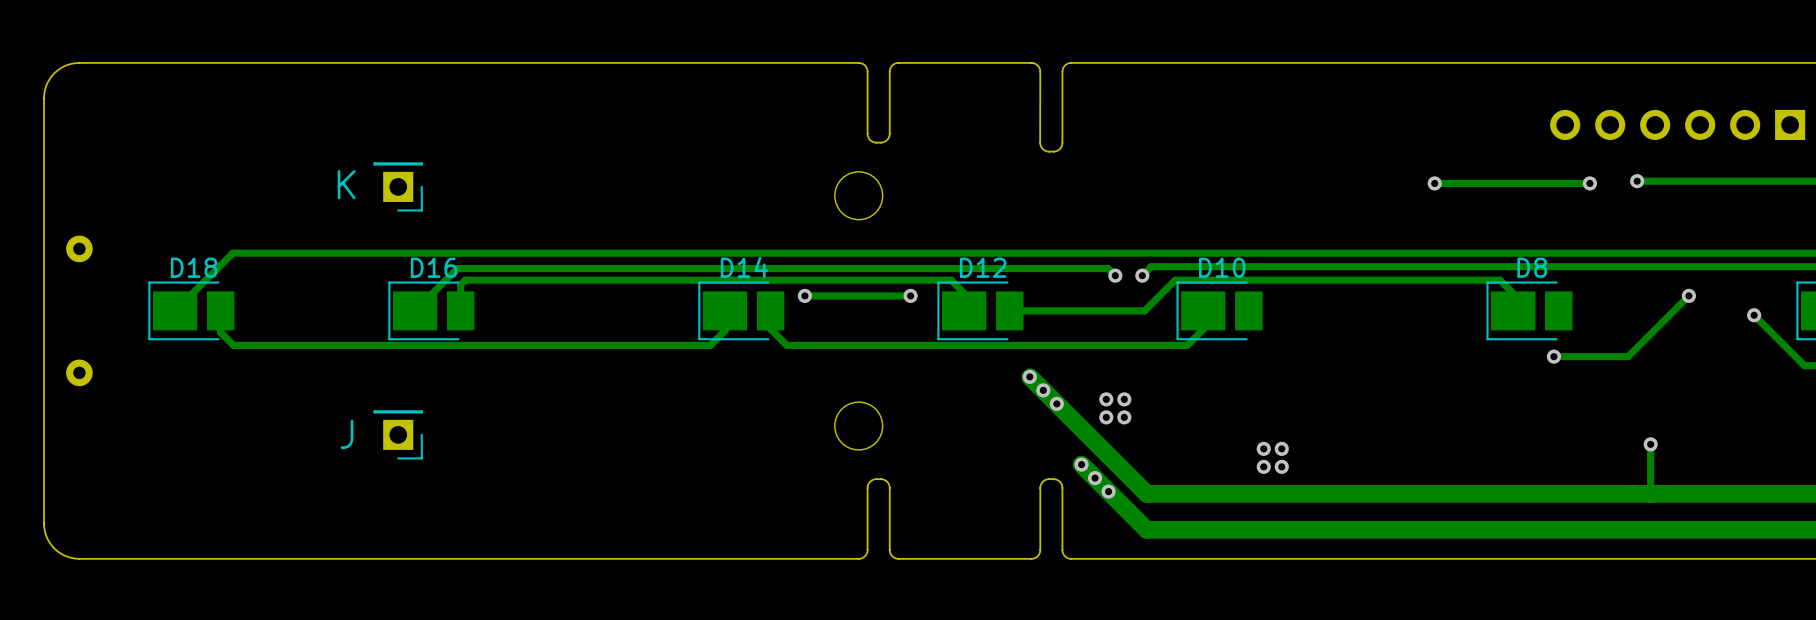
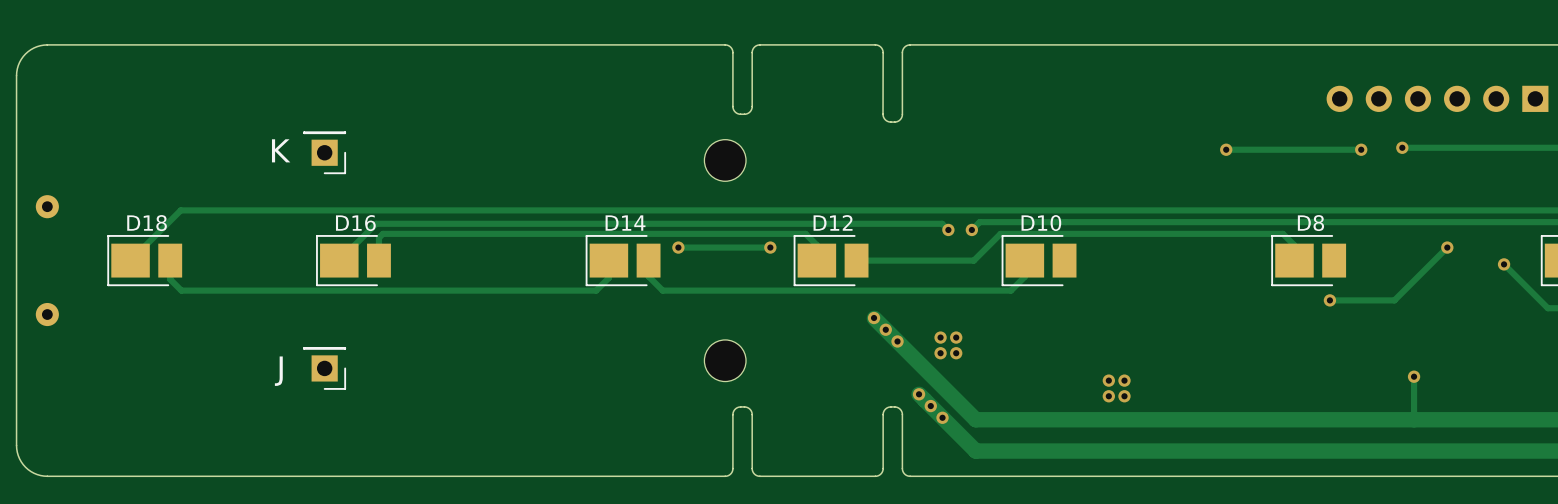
via: (1263, 448) -> none
via: (1281, 448) -> none
via: none -> (1108, 380)
via: none -> (1124, 380)
via: (1263, 466) -> none
via: (1281, 466) -> none
via: none -> (1108, 396)
via: none -> (1124, 396)

